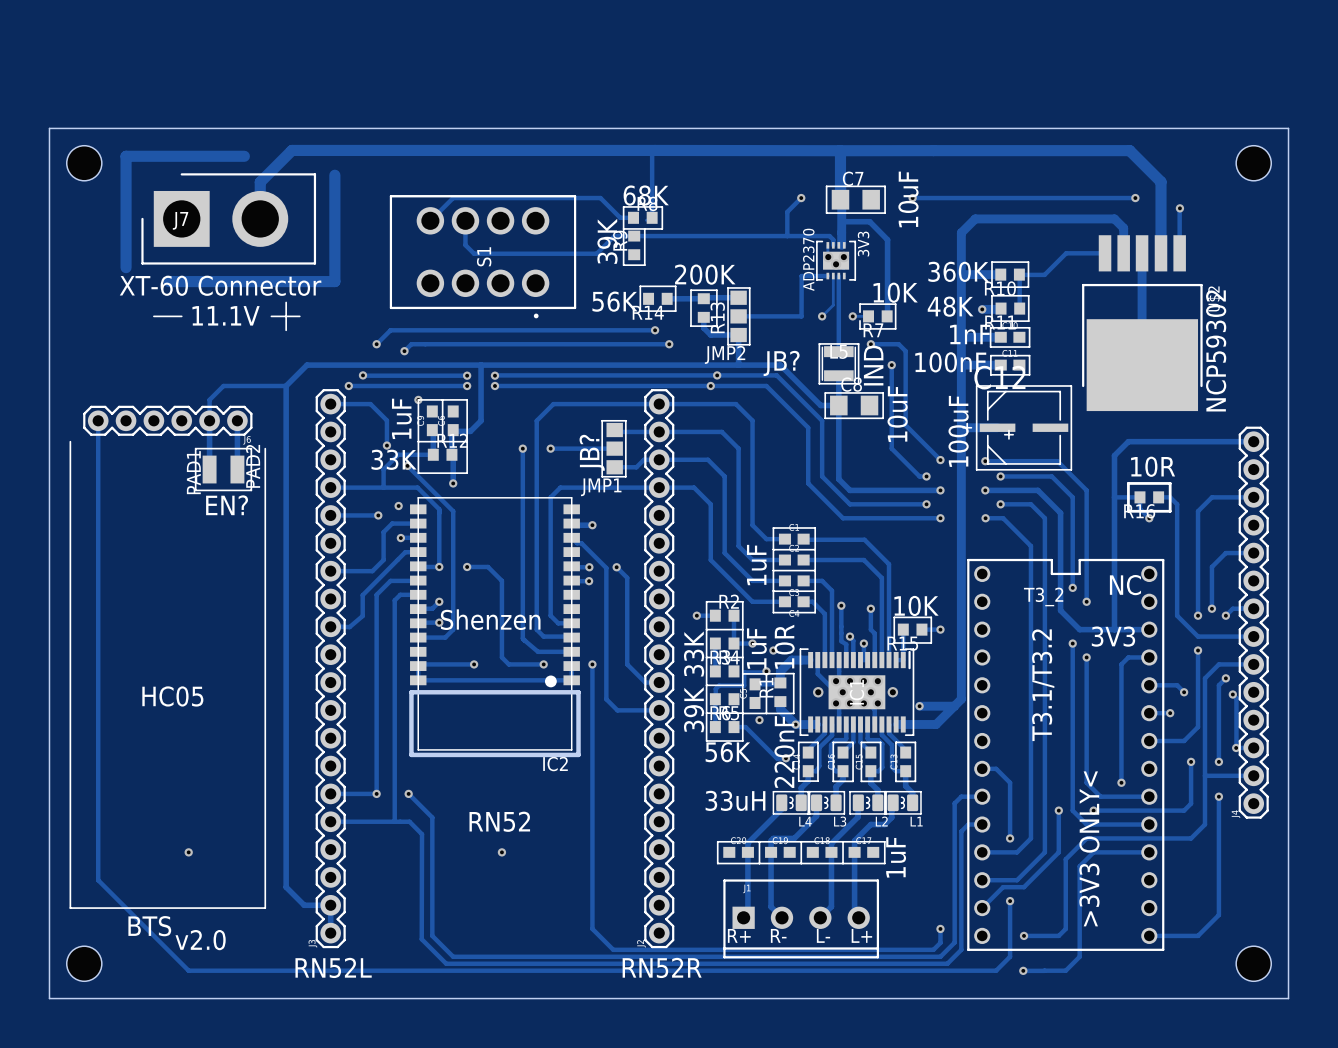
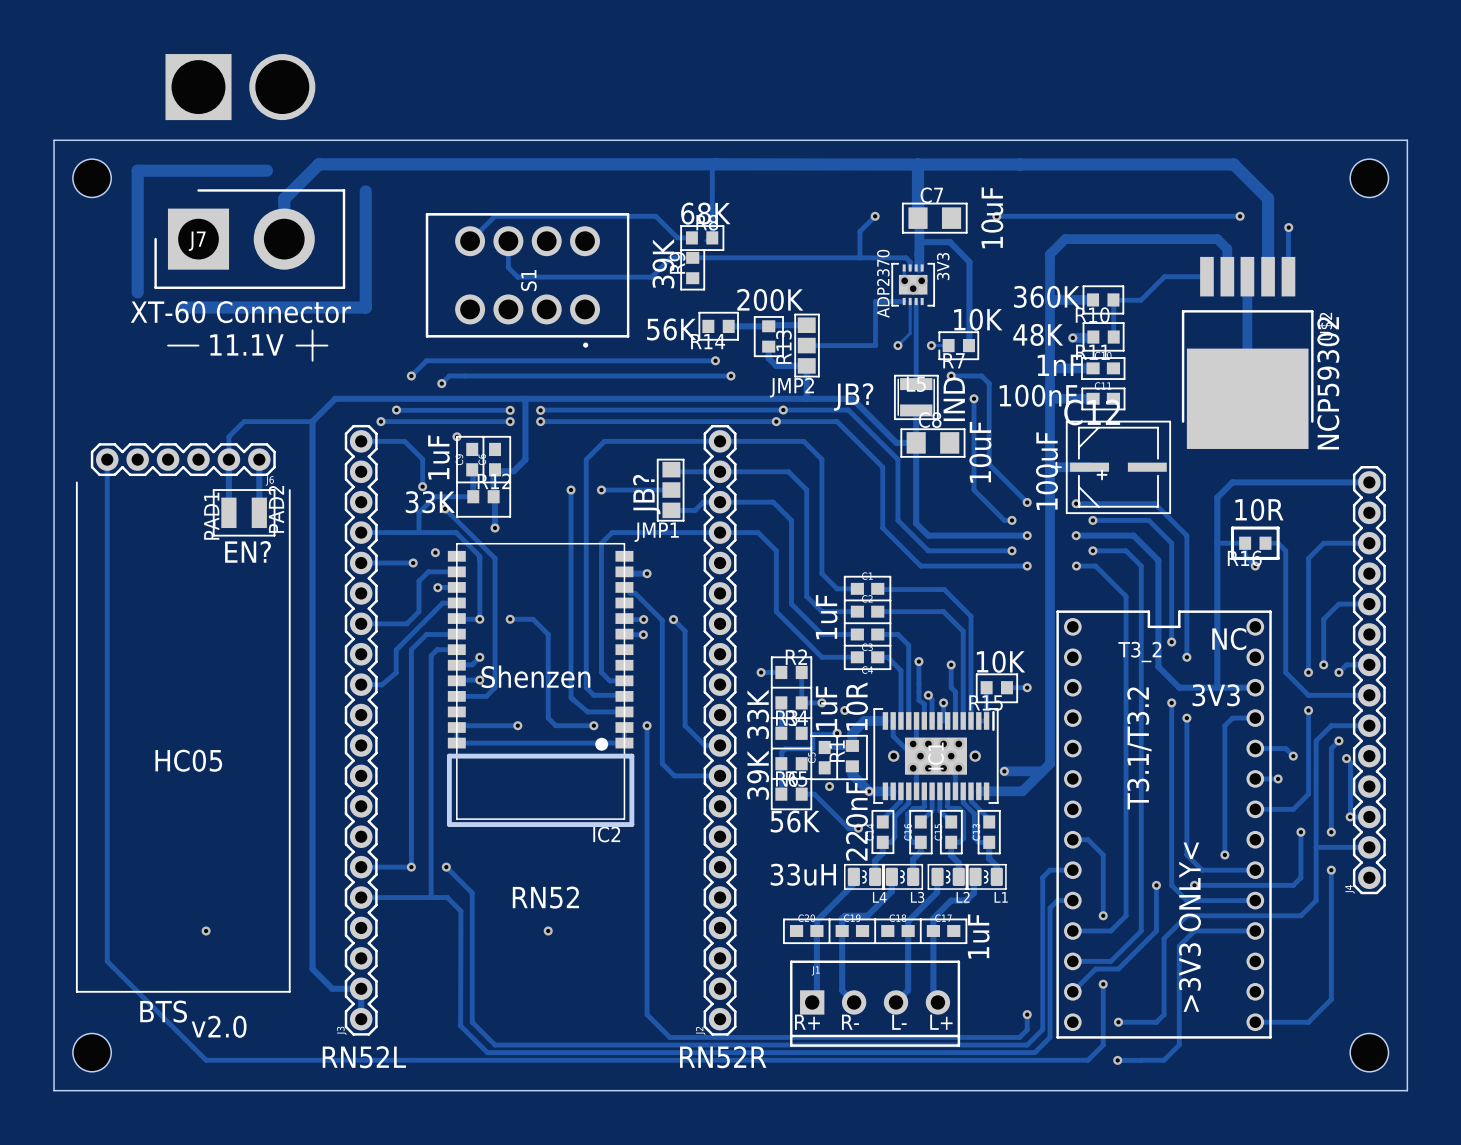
part: none -> (240, 87)

